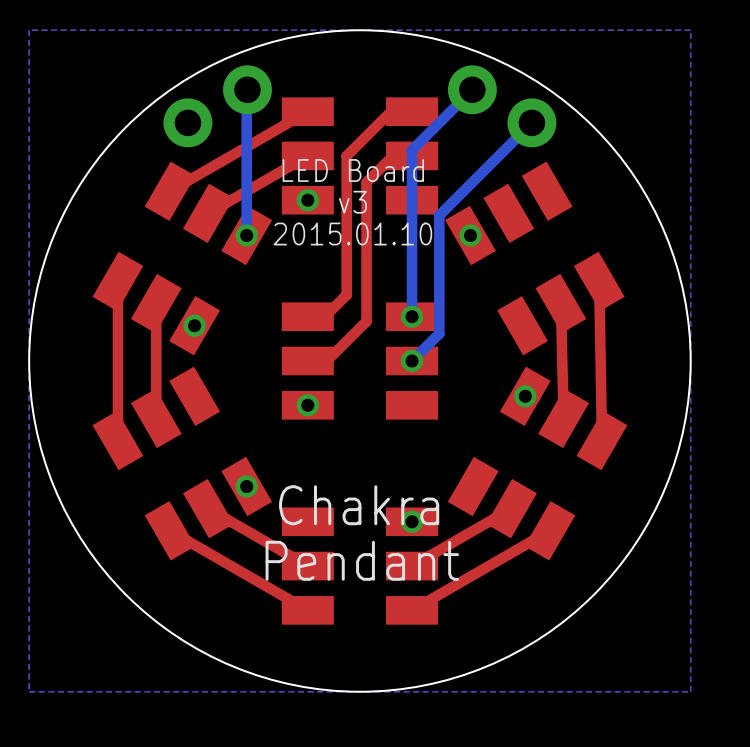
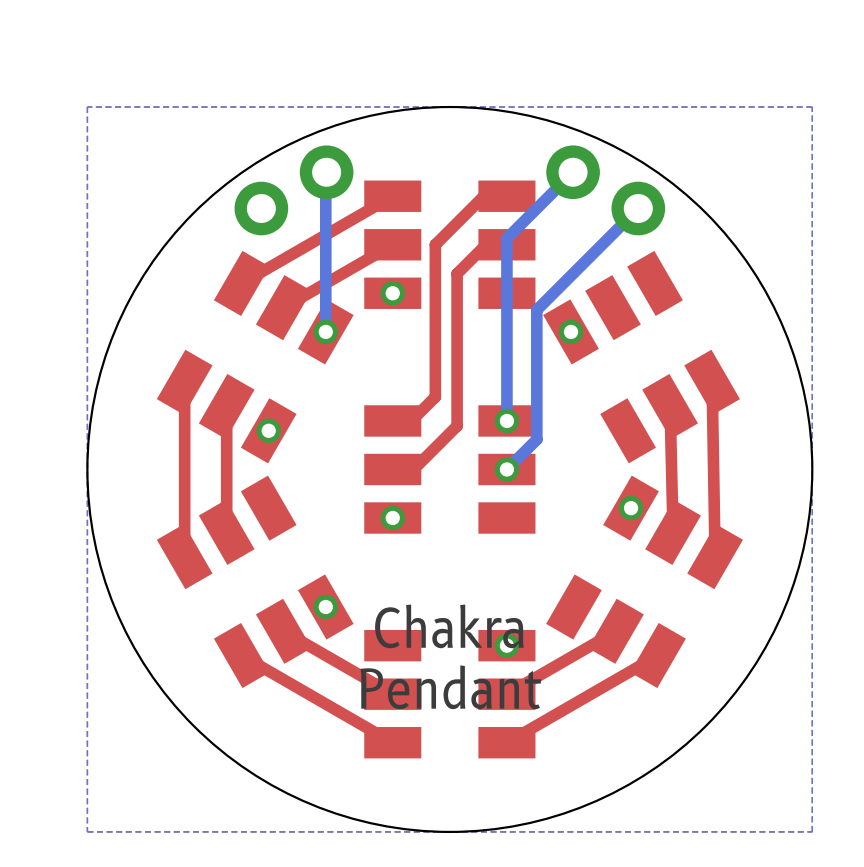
text: LED Board (353, 170) -> none
text: v3 (352, 202) -> none
text: 2015.01.10 (352, 234) -> none

